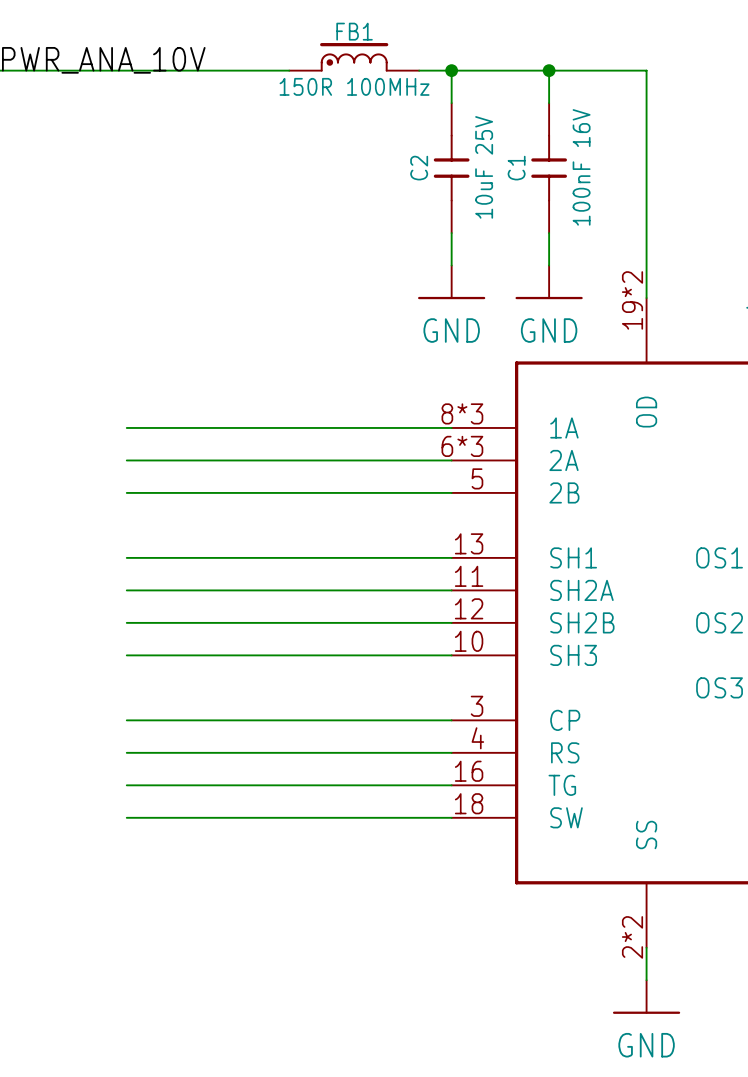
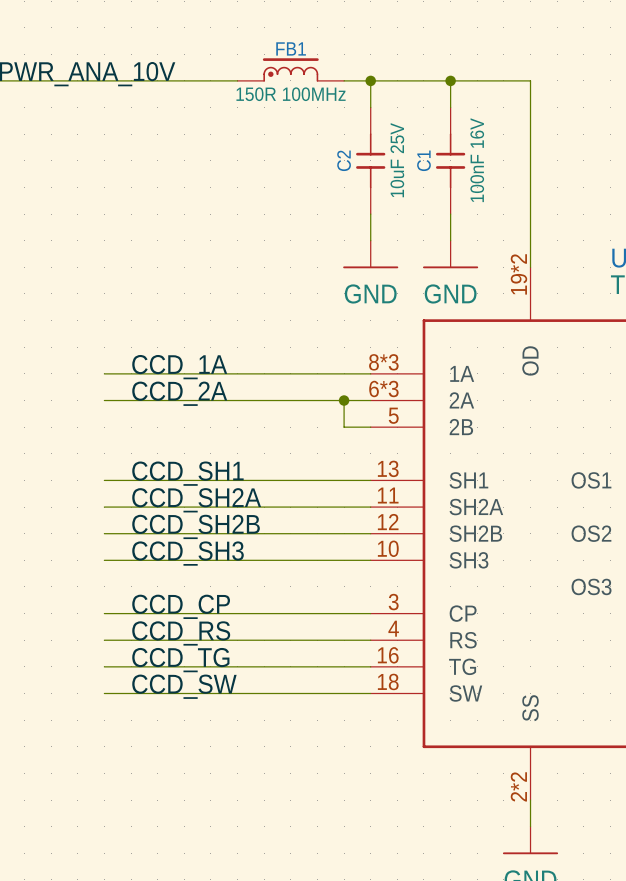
label: none -> CCD_1A (179, 367)
label: none -> CCD_2A (179, 393)
junction: none -> (344, 400)
wire: (126, 492) (419, 492) -> (344, 400) (344, 427)
label: none -> CCD_SH1 (187, 473)
label: none -> CCD_SH2A (196, 500)
label: none -> CCD_SH2B (196, 526)
label: none -> CCD_SH3 (188, 553)
label: none -> CCD_CP (181, 606)
label: none -> CCD_RS (181, 633)
label: none -> CCD_TG (180, 660)
label: none -> CCD_SW (184, 686)

